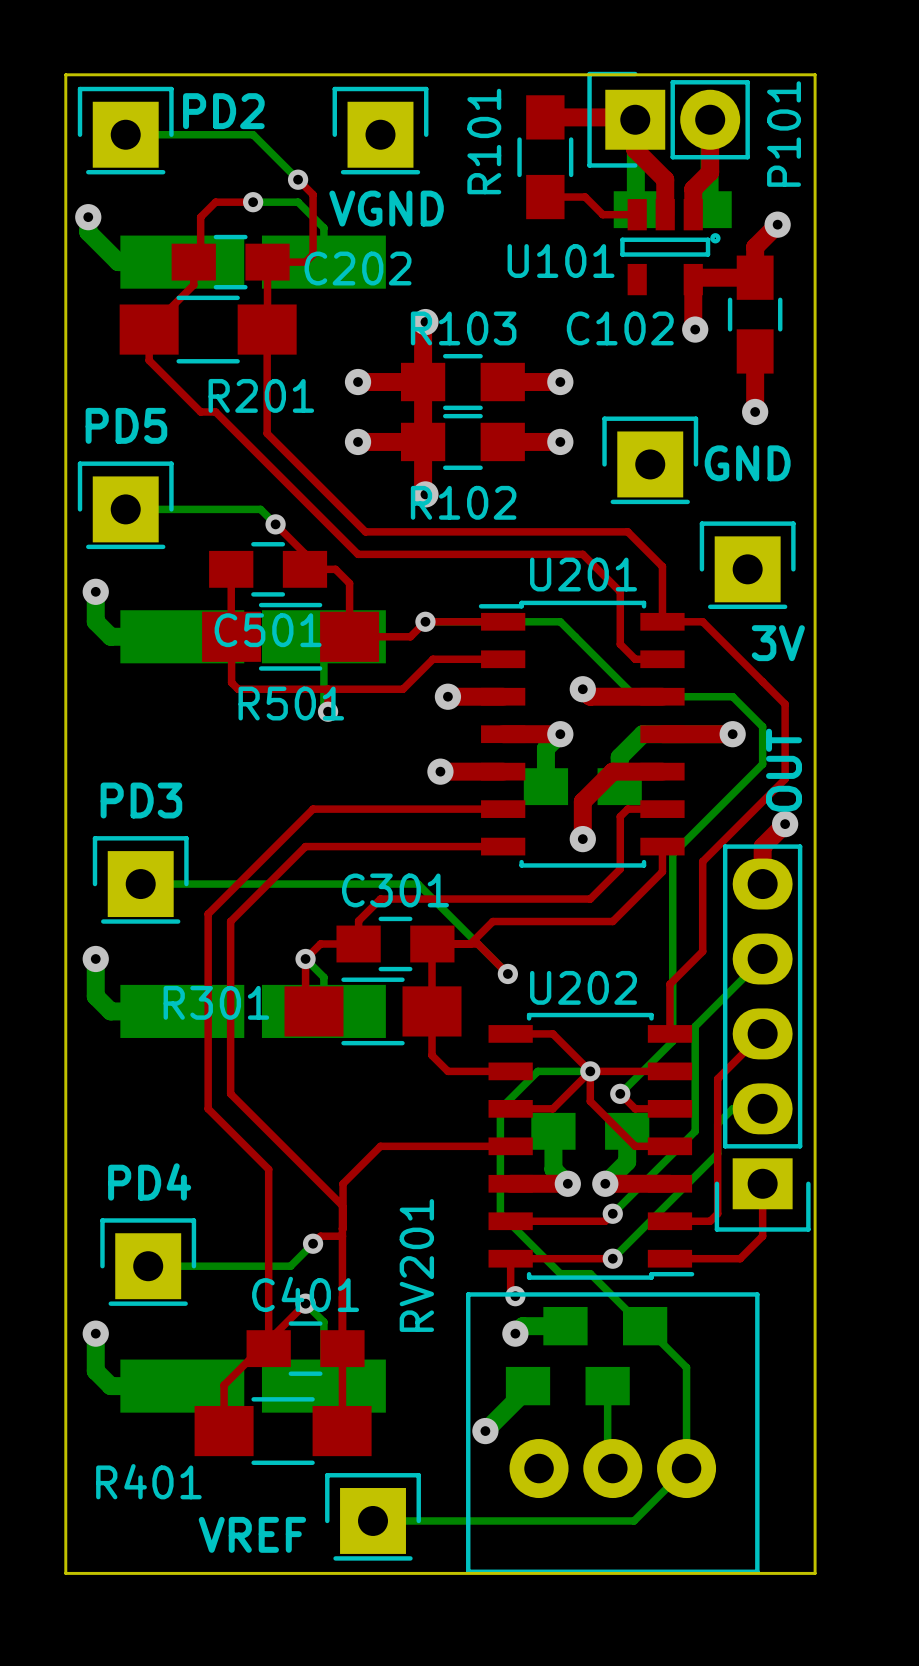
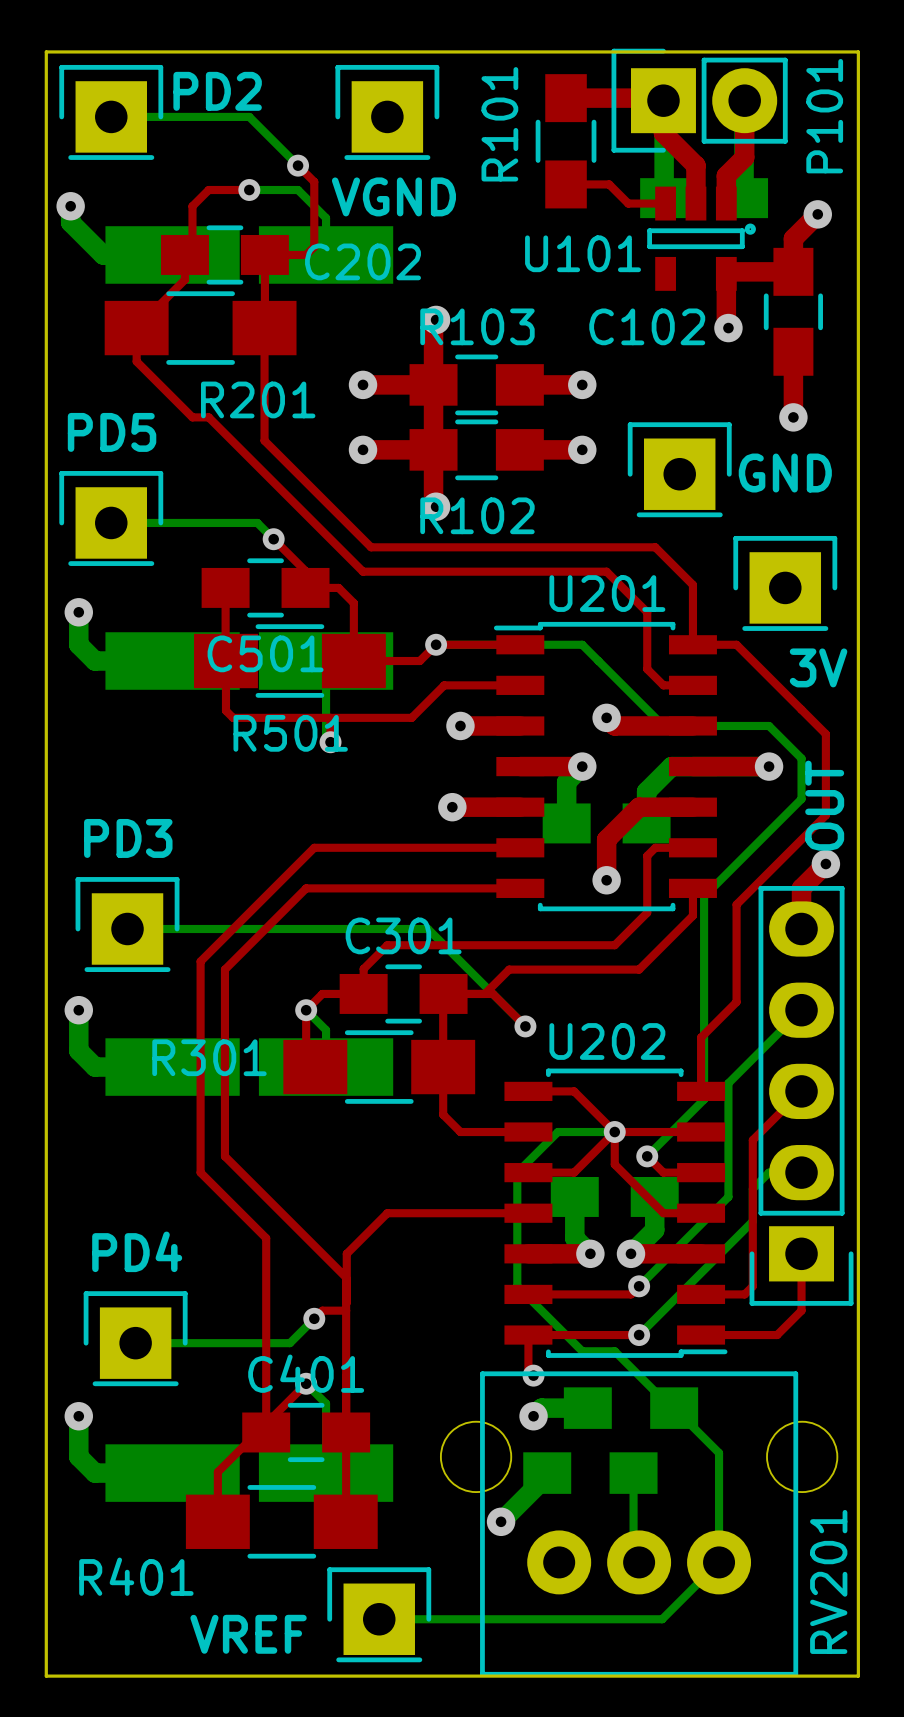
RV201 name position: RV201 (416, 1265) -> RV201 (828, 1581)
RV201 footprint: [432, 1292, 793, 1574] -> [440, 1371, 838, 1677]

